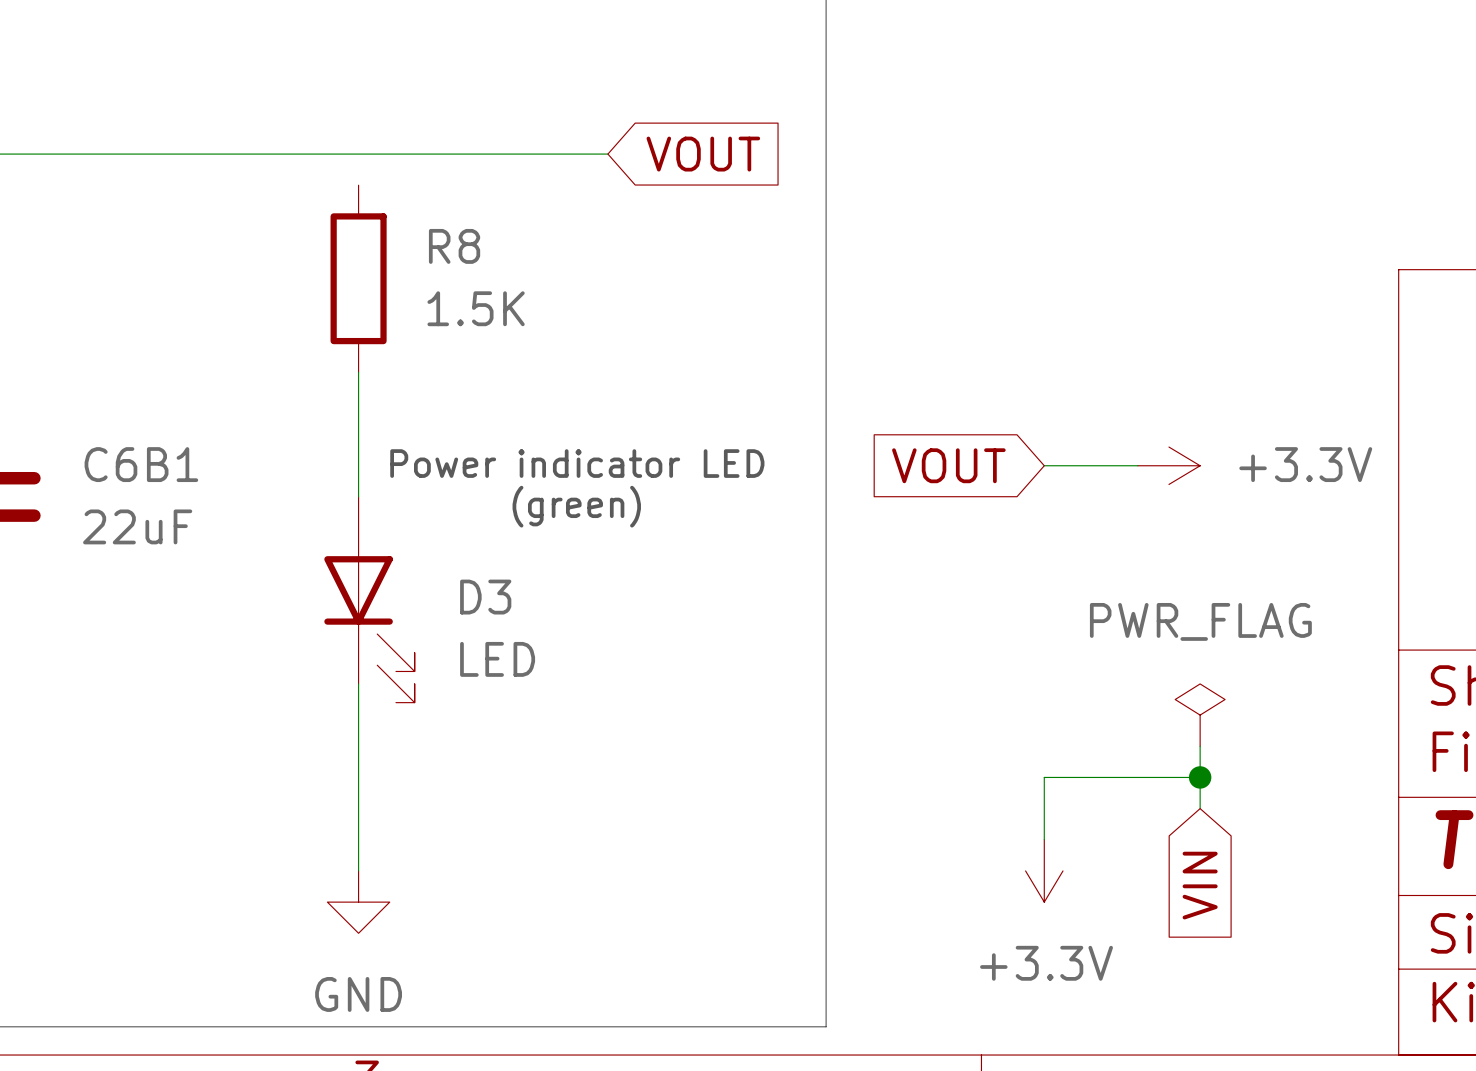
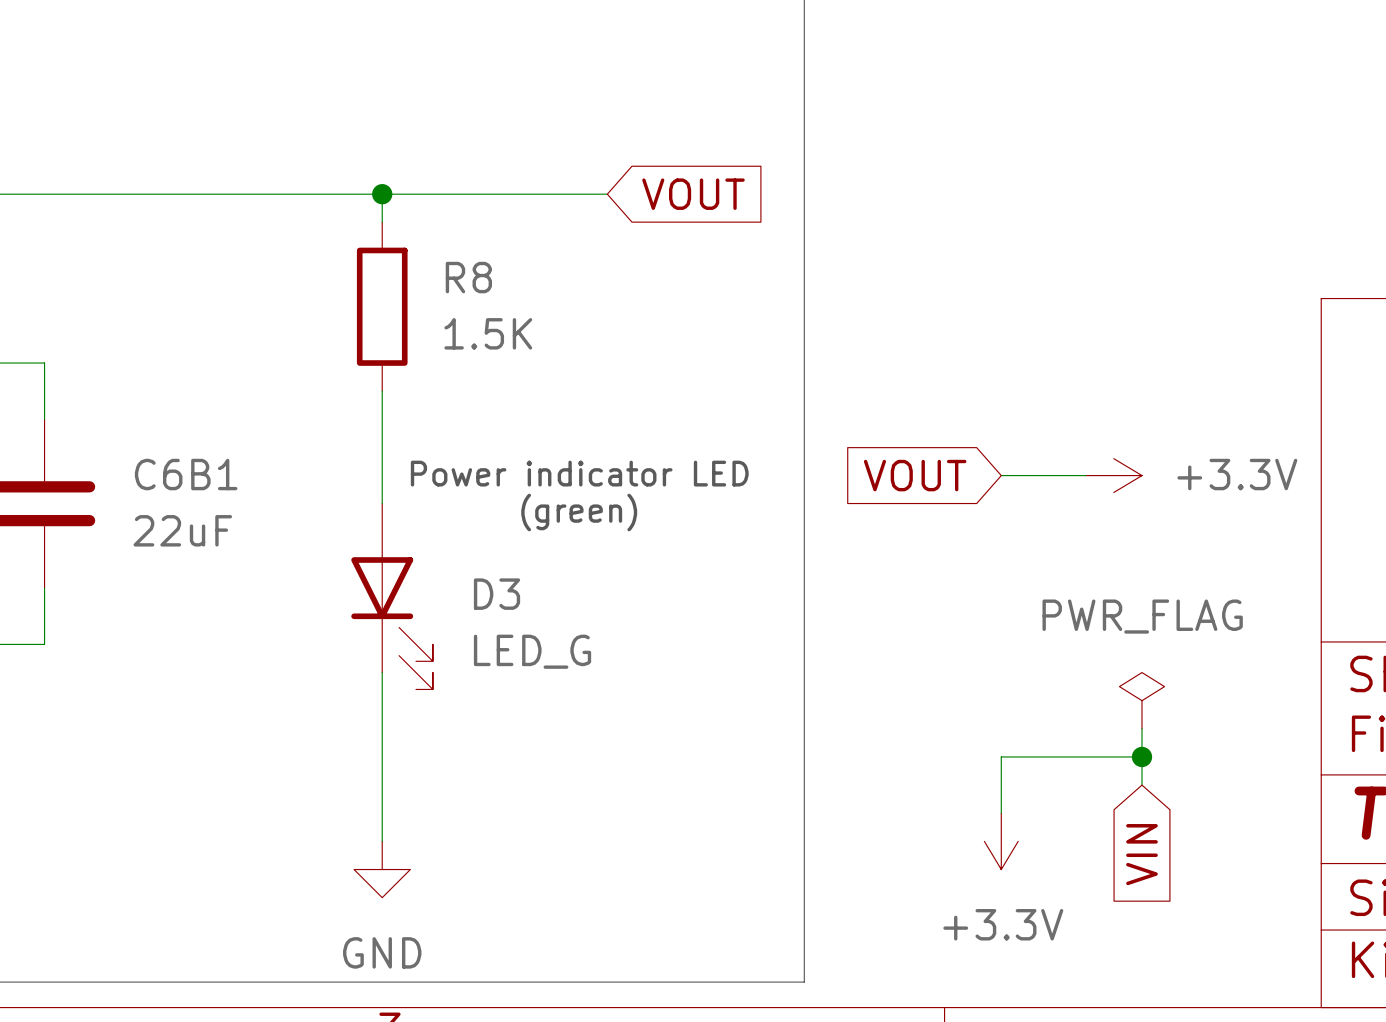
wire: none -> (382, 194) (382, 222)
junction: none -> (382, 194)
D3 value: LED (497, 659) -> LED_G (532, 651)

